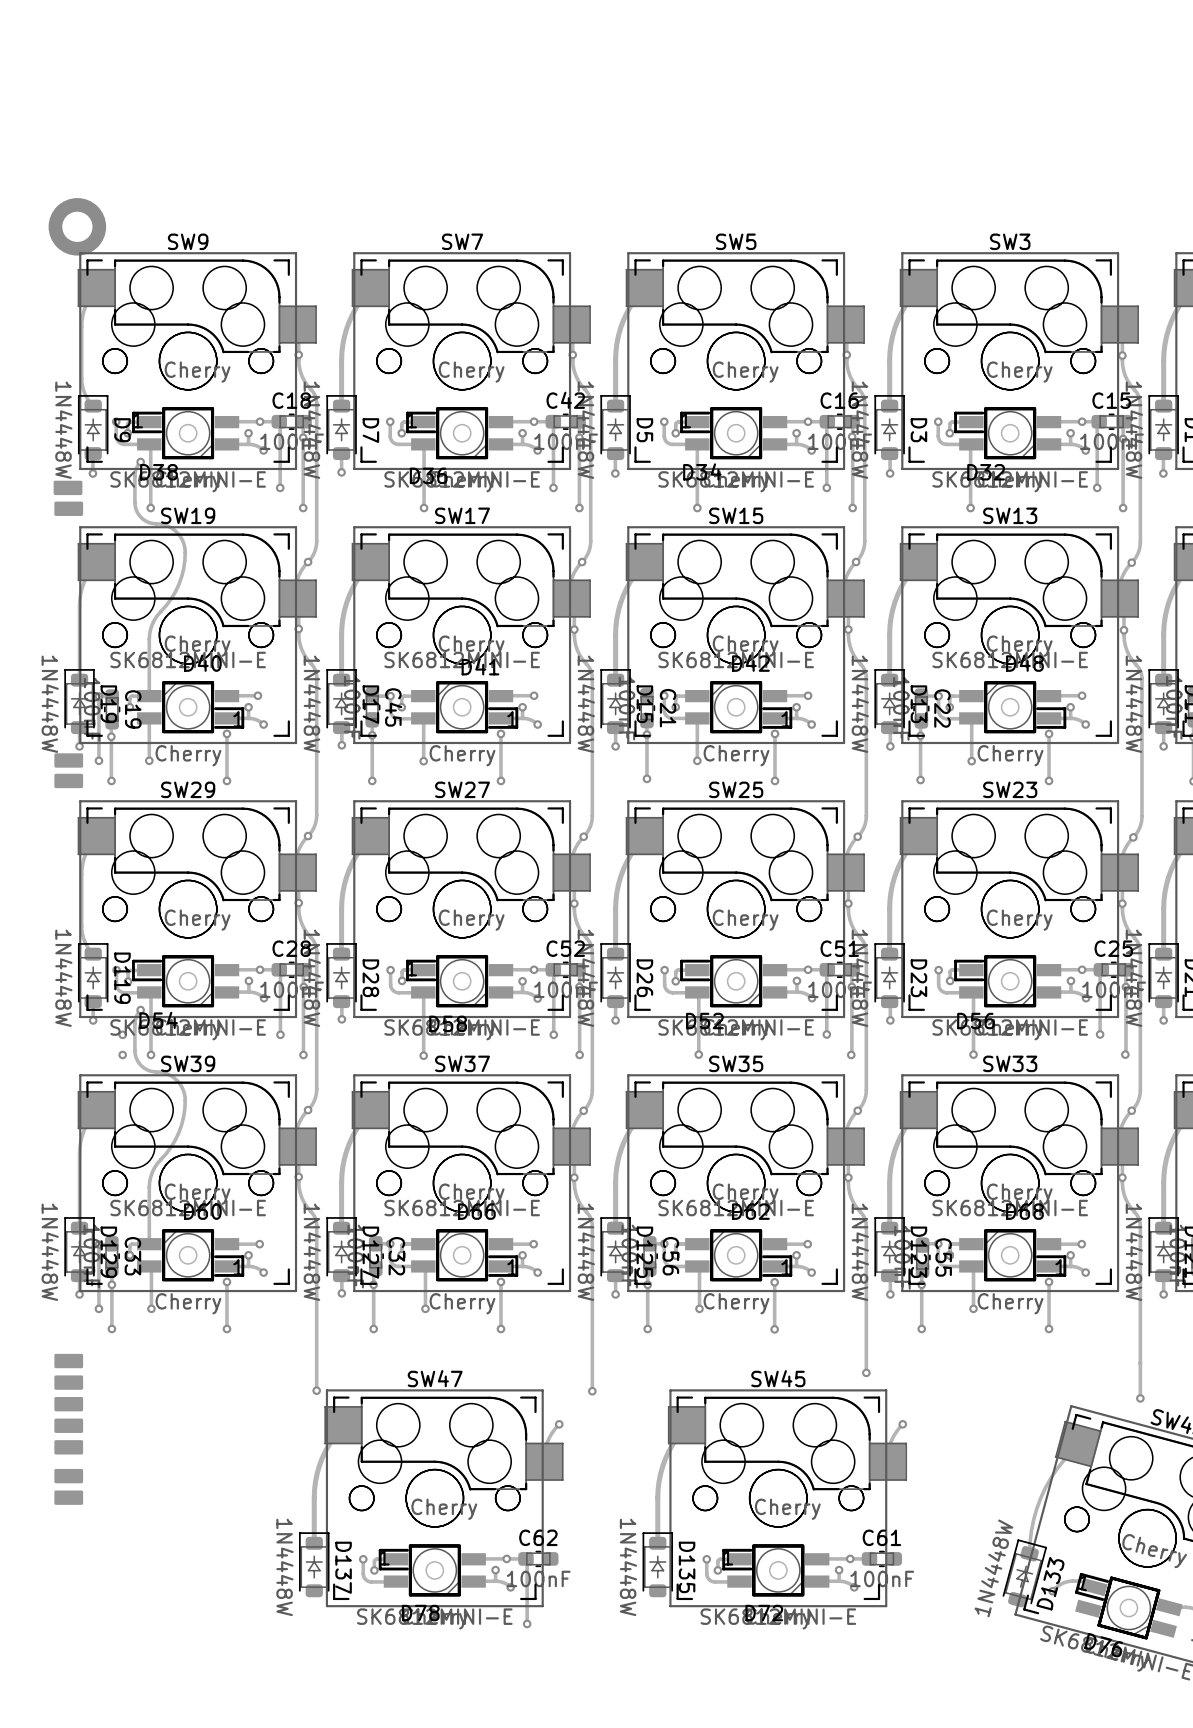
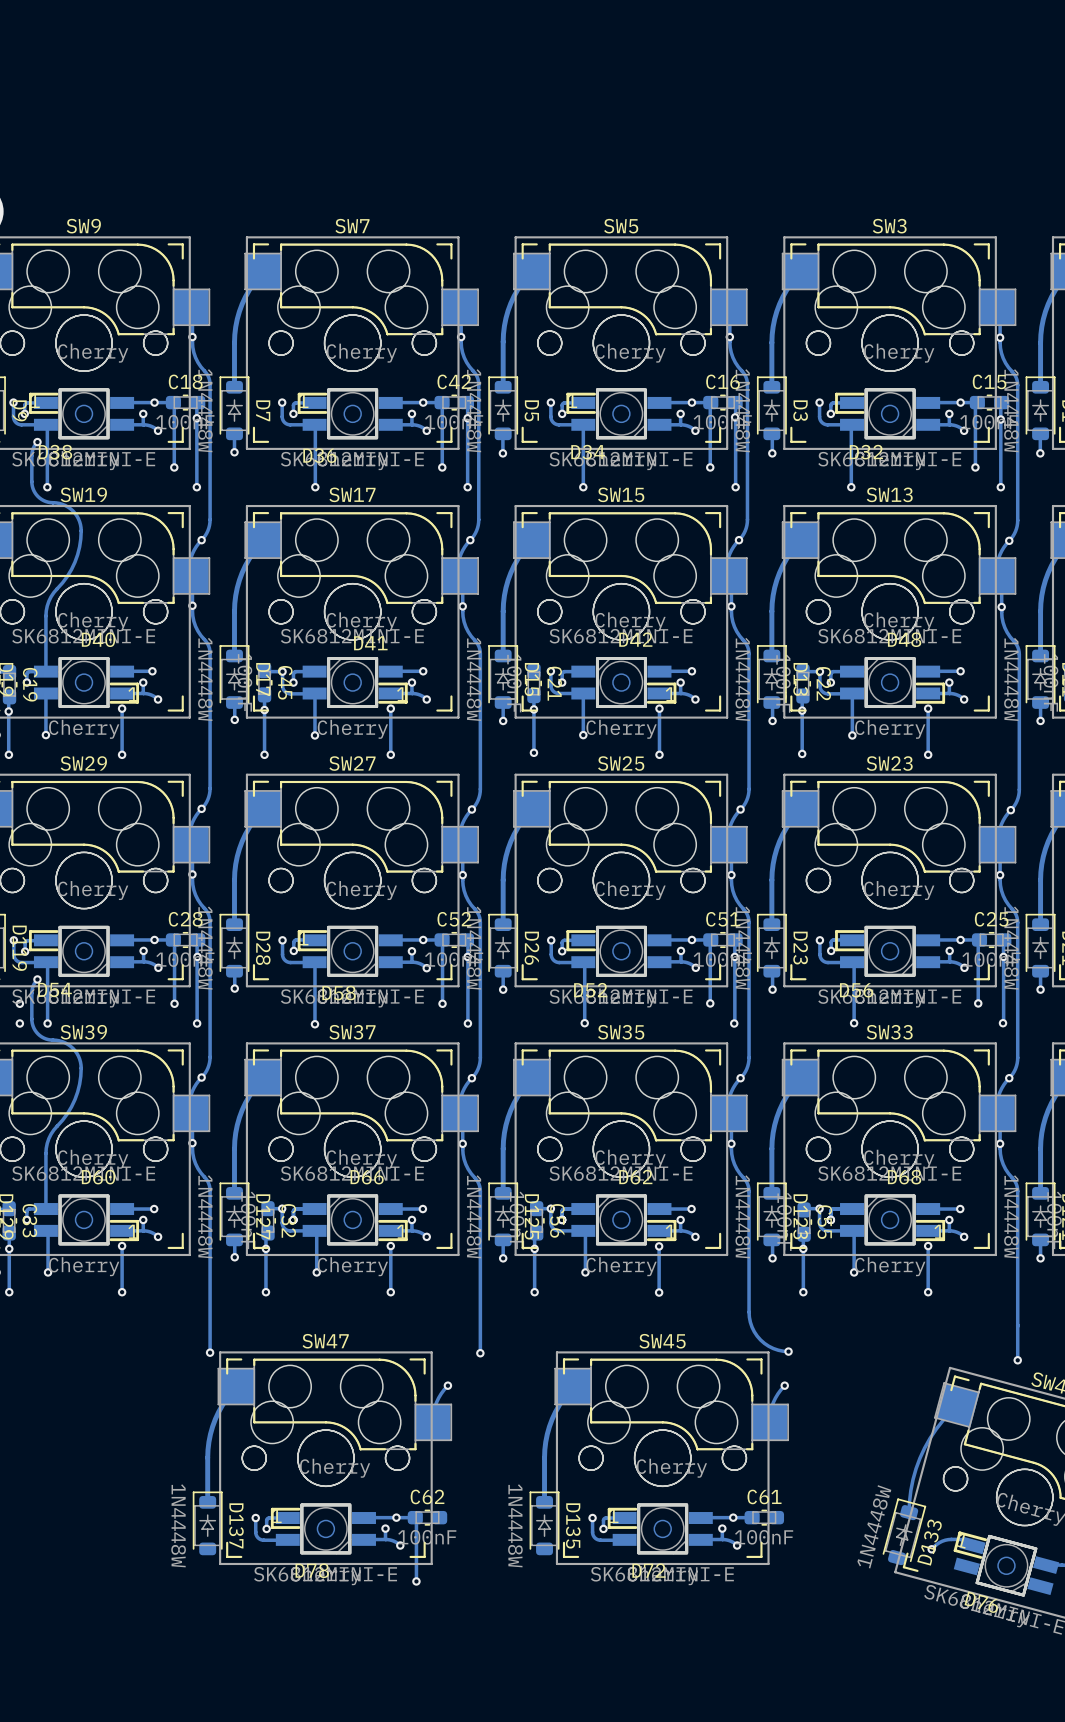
track: (866, 1349) (866, 1372) -> (749, 1312) (752, 1327) (760, 1340) (773, 1348) (788, 1351)
via position: (866, 1372) -> (788, 1351)

